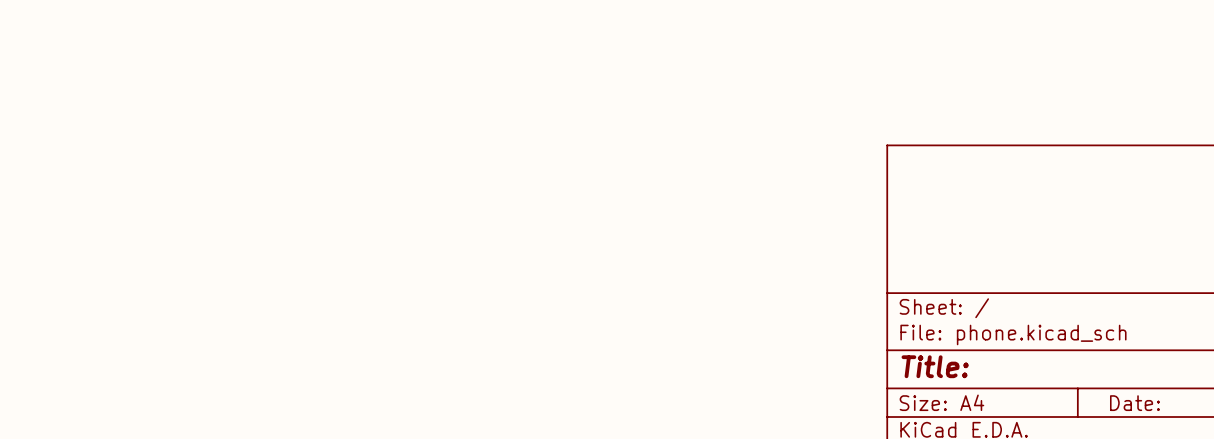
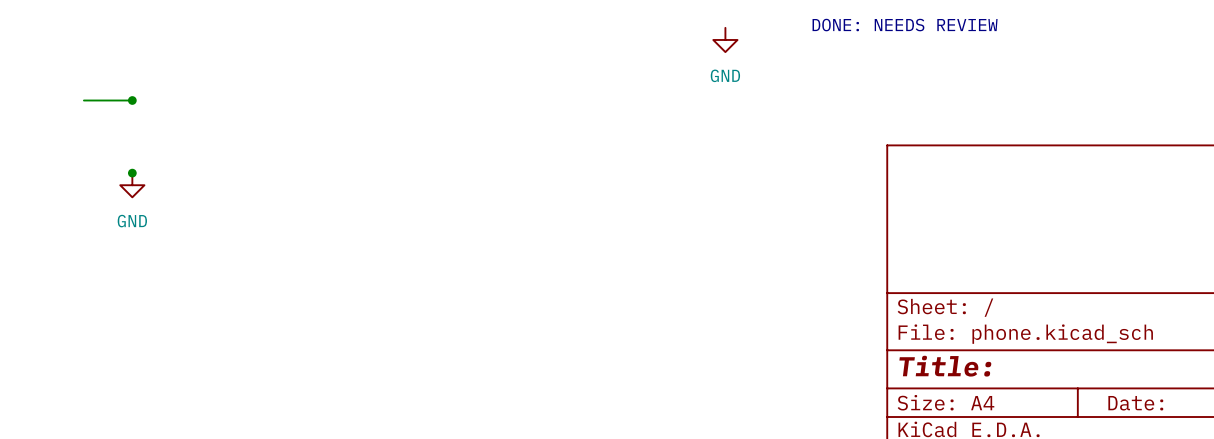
text: none -> DONE: NEEDS REVIEW (905, 25)
power symbol: none -> GND (725, 39)
wire: none -> (83, 100) (132, 100)
junction: none -> (132, 100)
junction: none -> (132, 173)
power symbol: none -> GND (132, 185)

